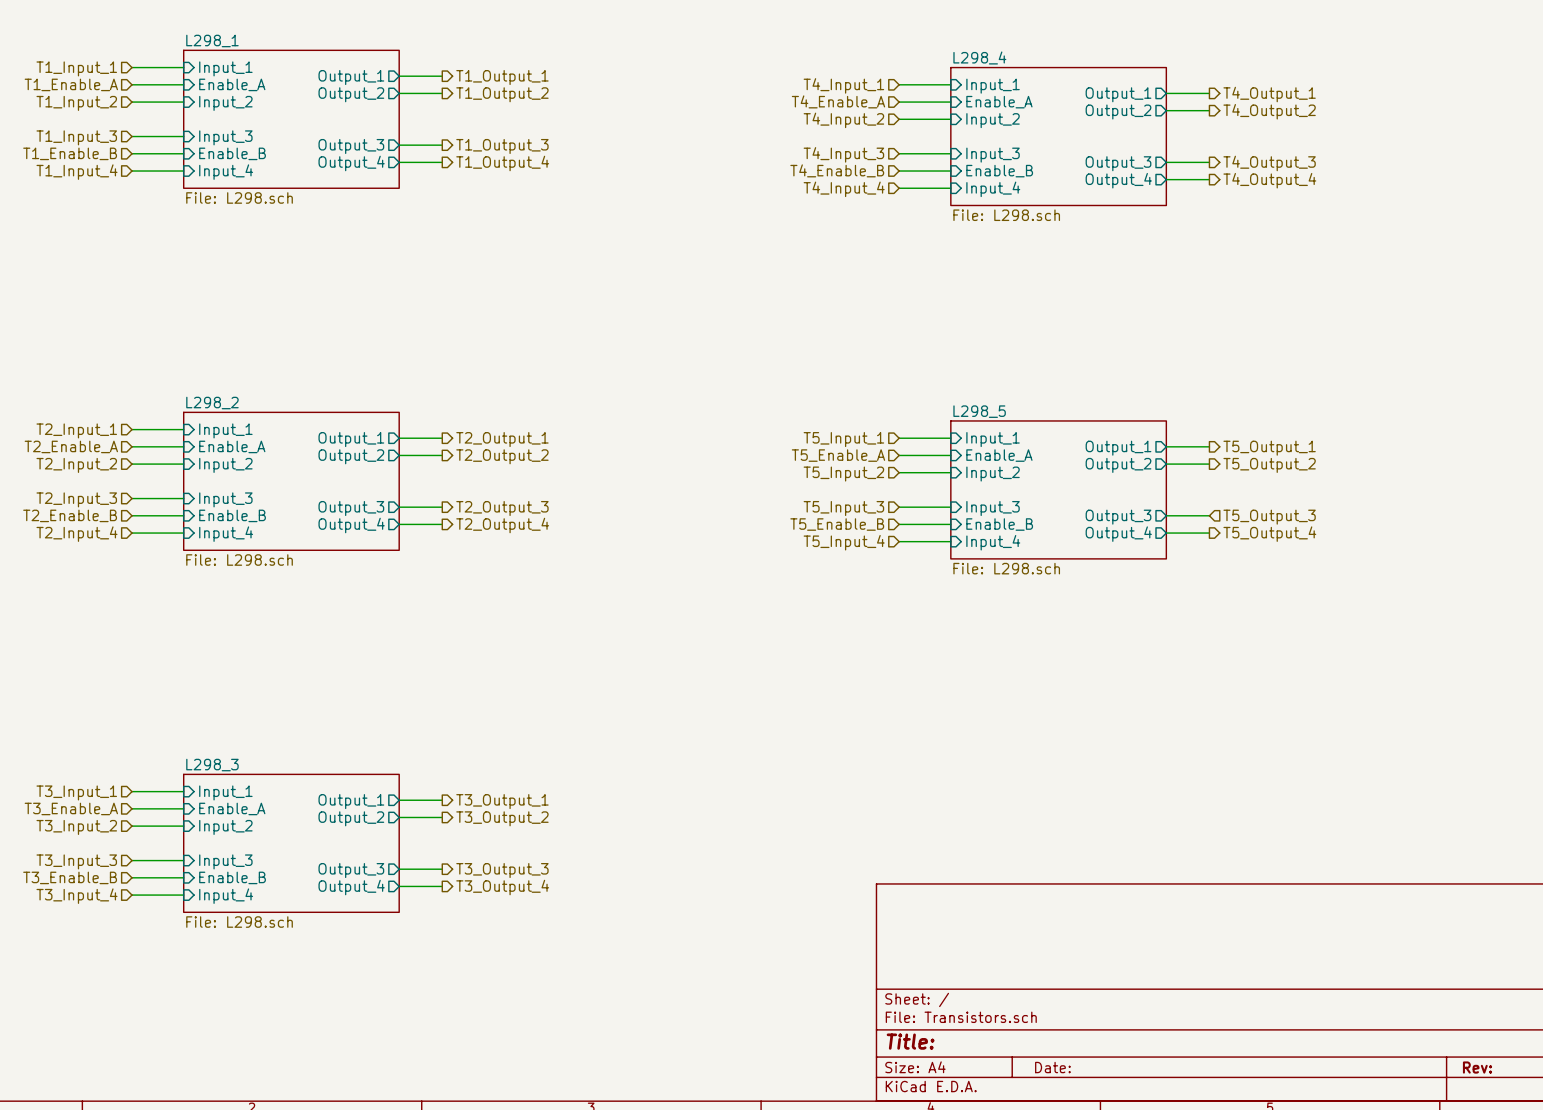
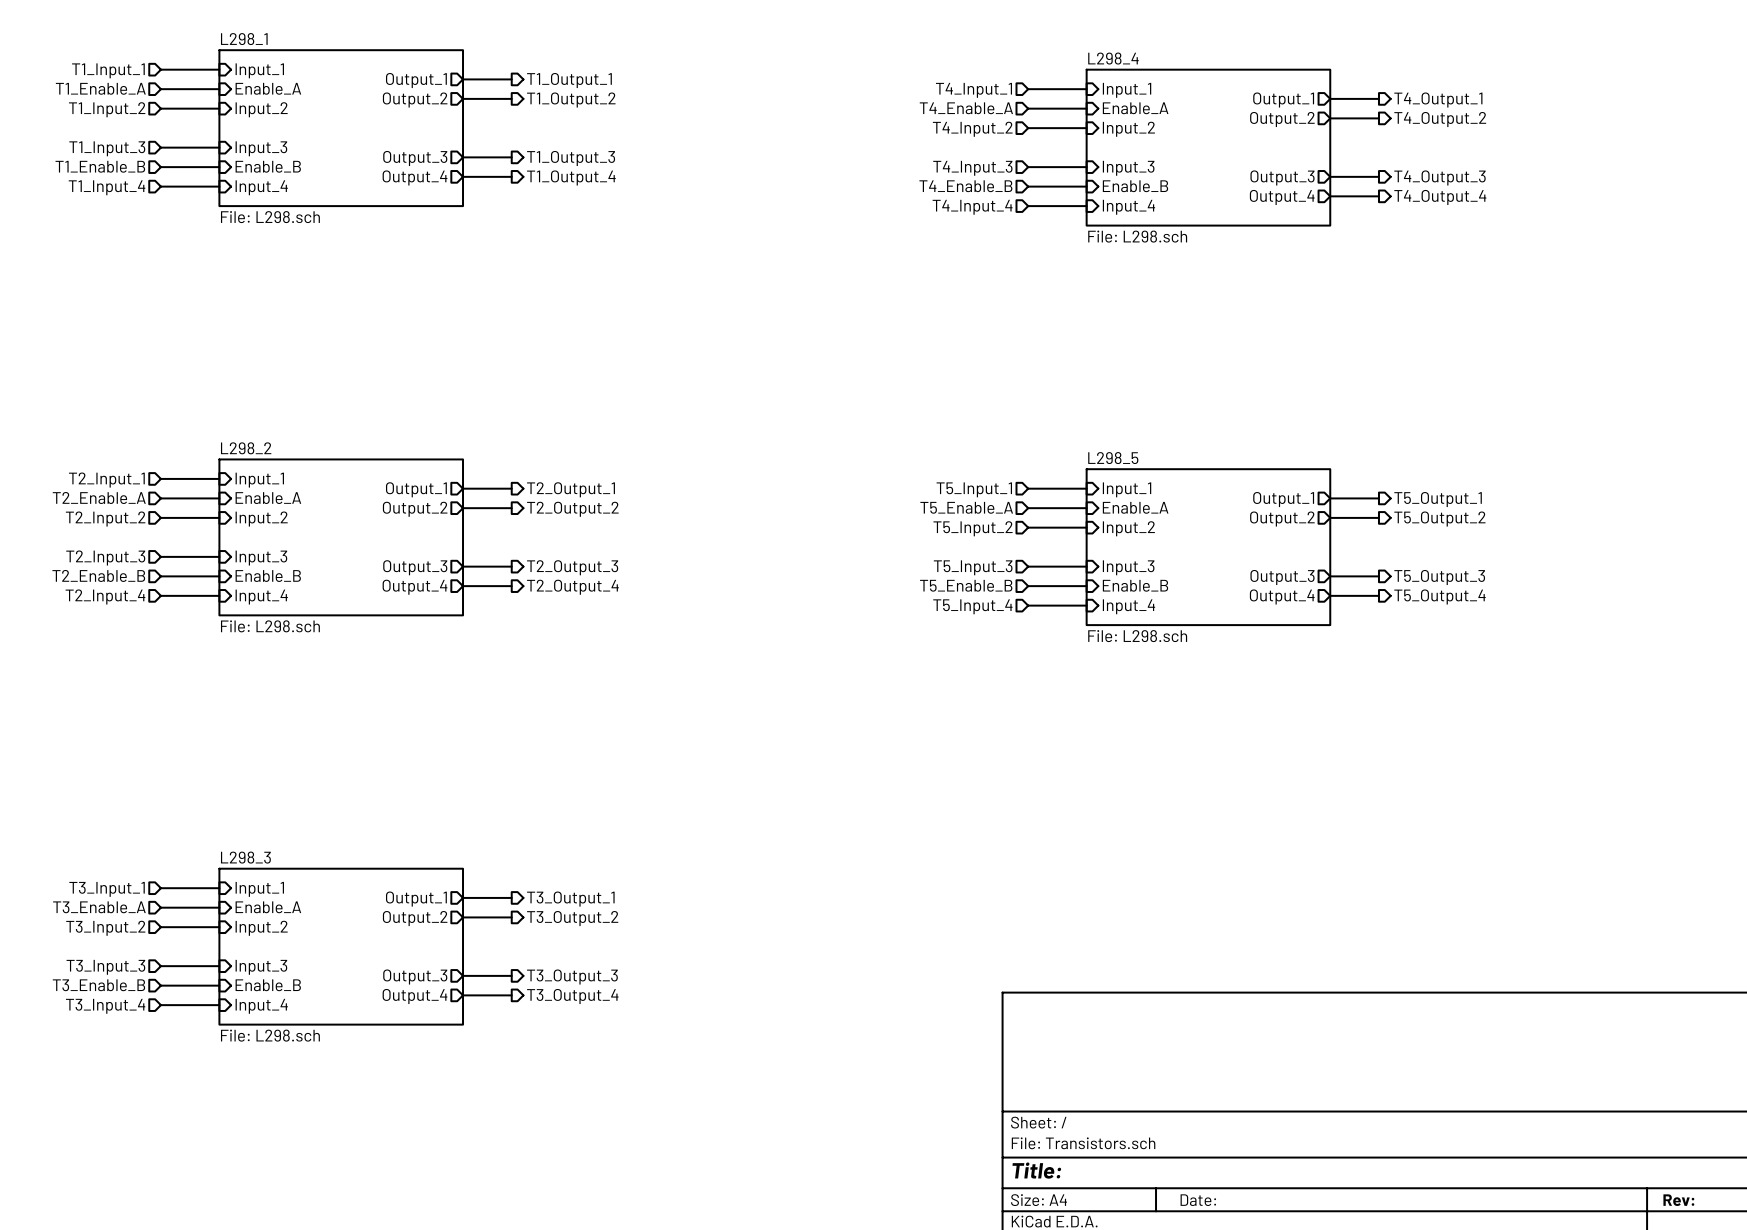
hierarchical label shape: input (1269, 517) -> output (1439, 577)

